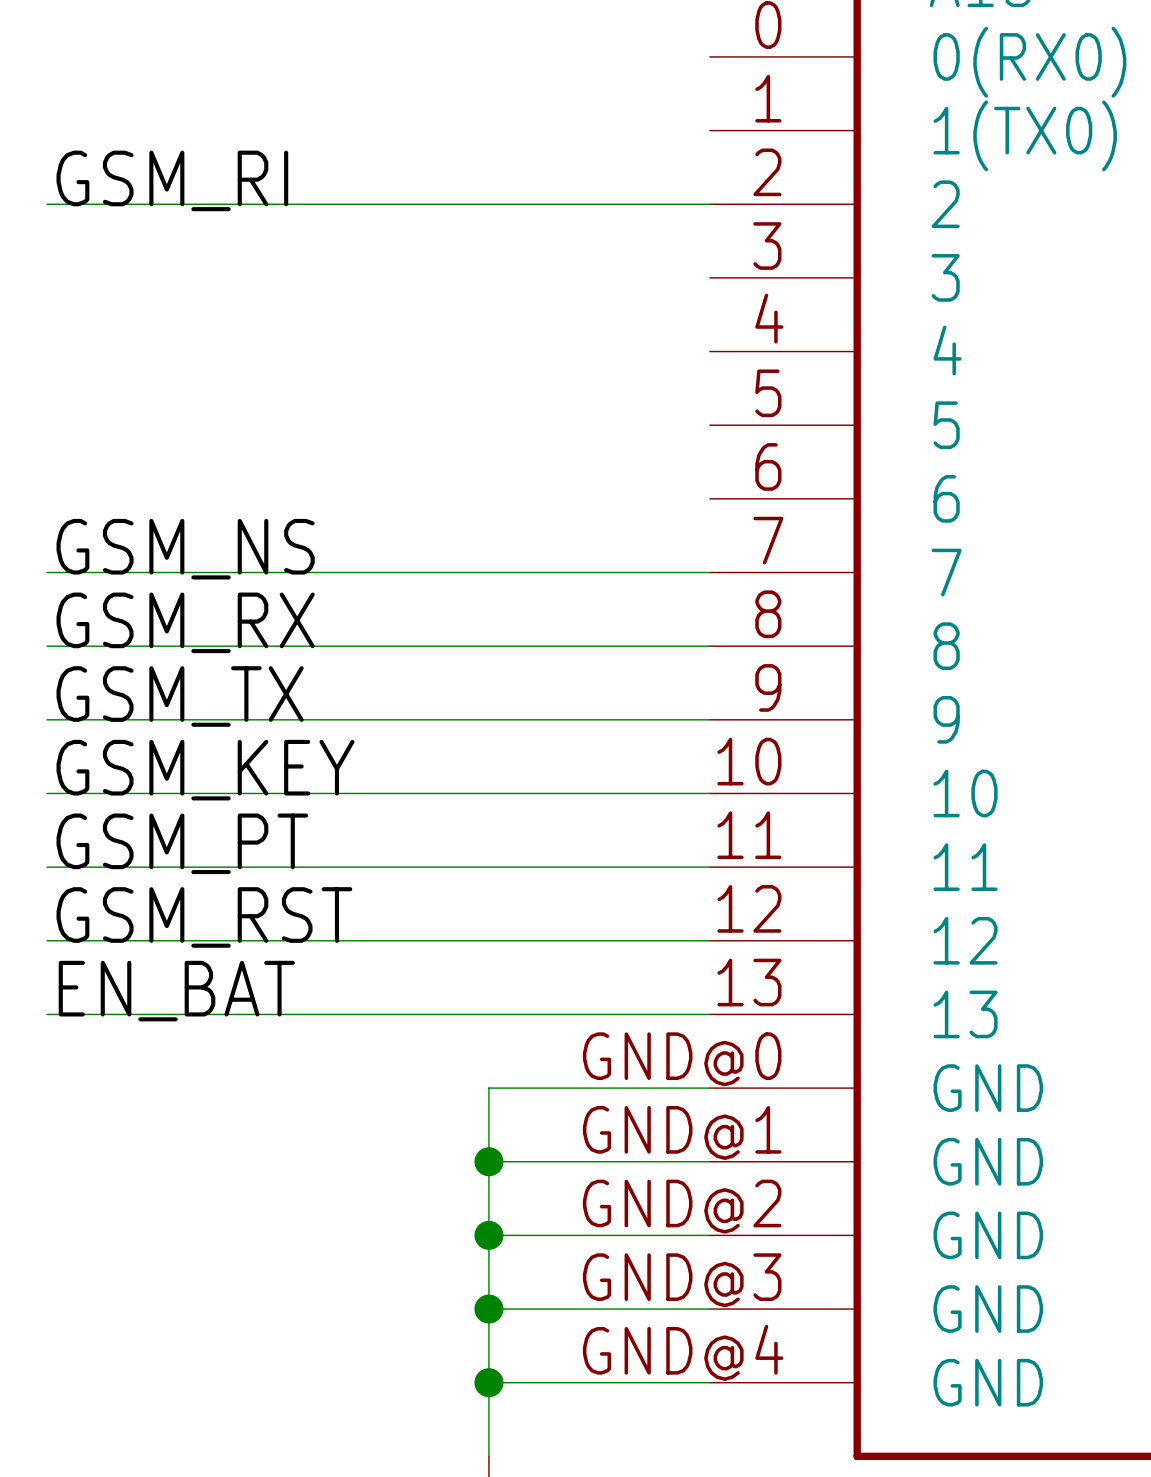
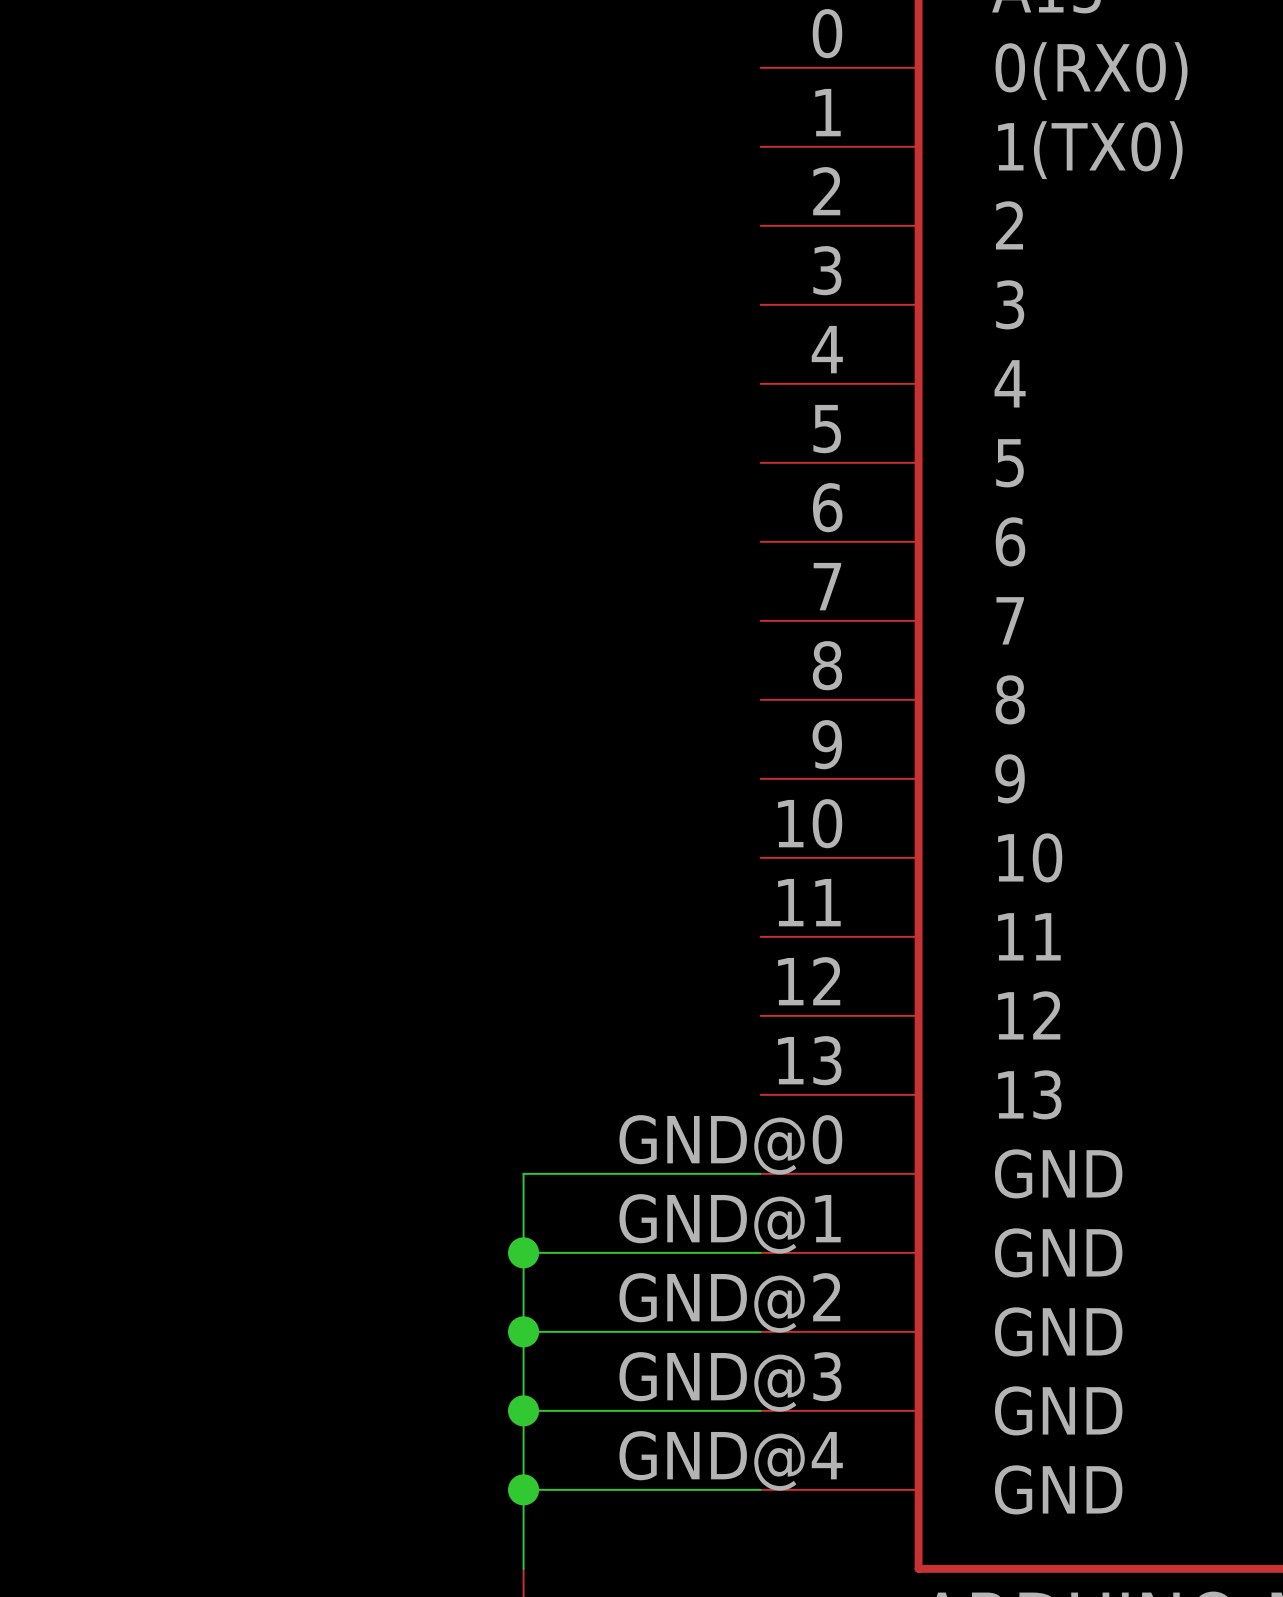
label: GSM_RI (172, 180) -> none
wire: (47, 204) (709, 204) -> none
label: GSM_NS (185, 549) -> none
wire: (47, 572) (709, 572) -> none
label: GSM_RX (185, 622) -> none
wire: (47, 646) (709, 646) -> none
label: GSM_TX (180, 696) -> none
wire: (47, 719) (709, 719) -> none
label: GSM_KEY (205, 770) -> none
wire: (47, 793) (709, 793) -> none
label: GSM_PT (182, 843) -> none
wire: (47, 867) (709, 867) -> none
label: GSM_RST (204, 917) -> none
wire: (47, 940) (709, 940) -> none
label: EN_BAT (176, 991) -> none
wire: (47, 1014) (709, 1014) -> none

